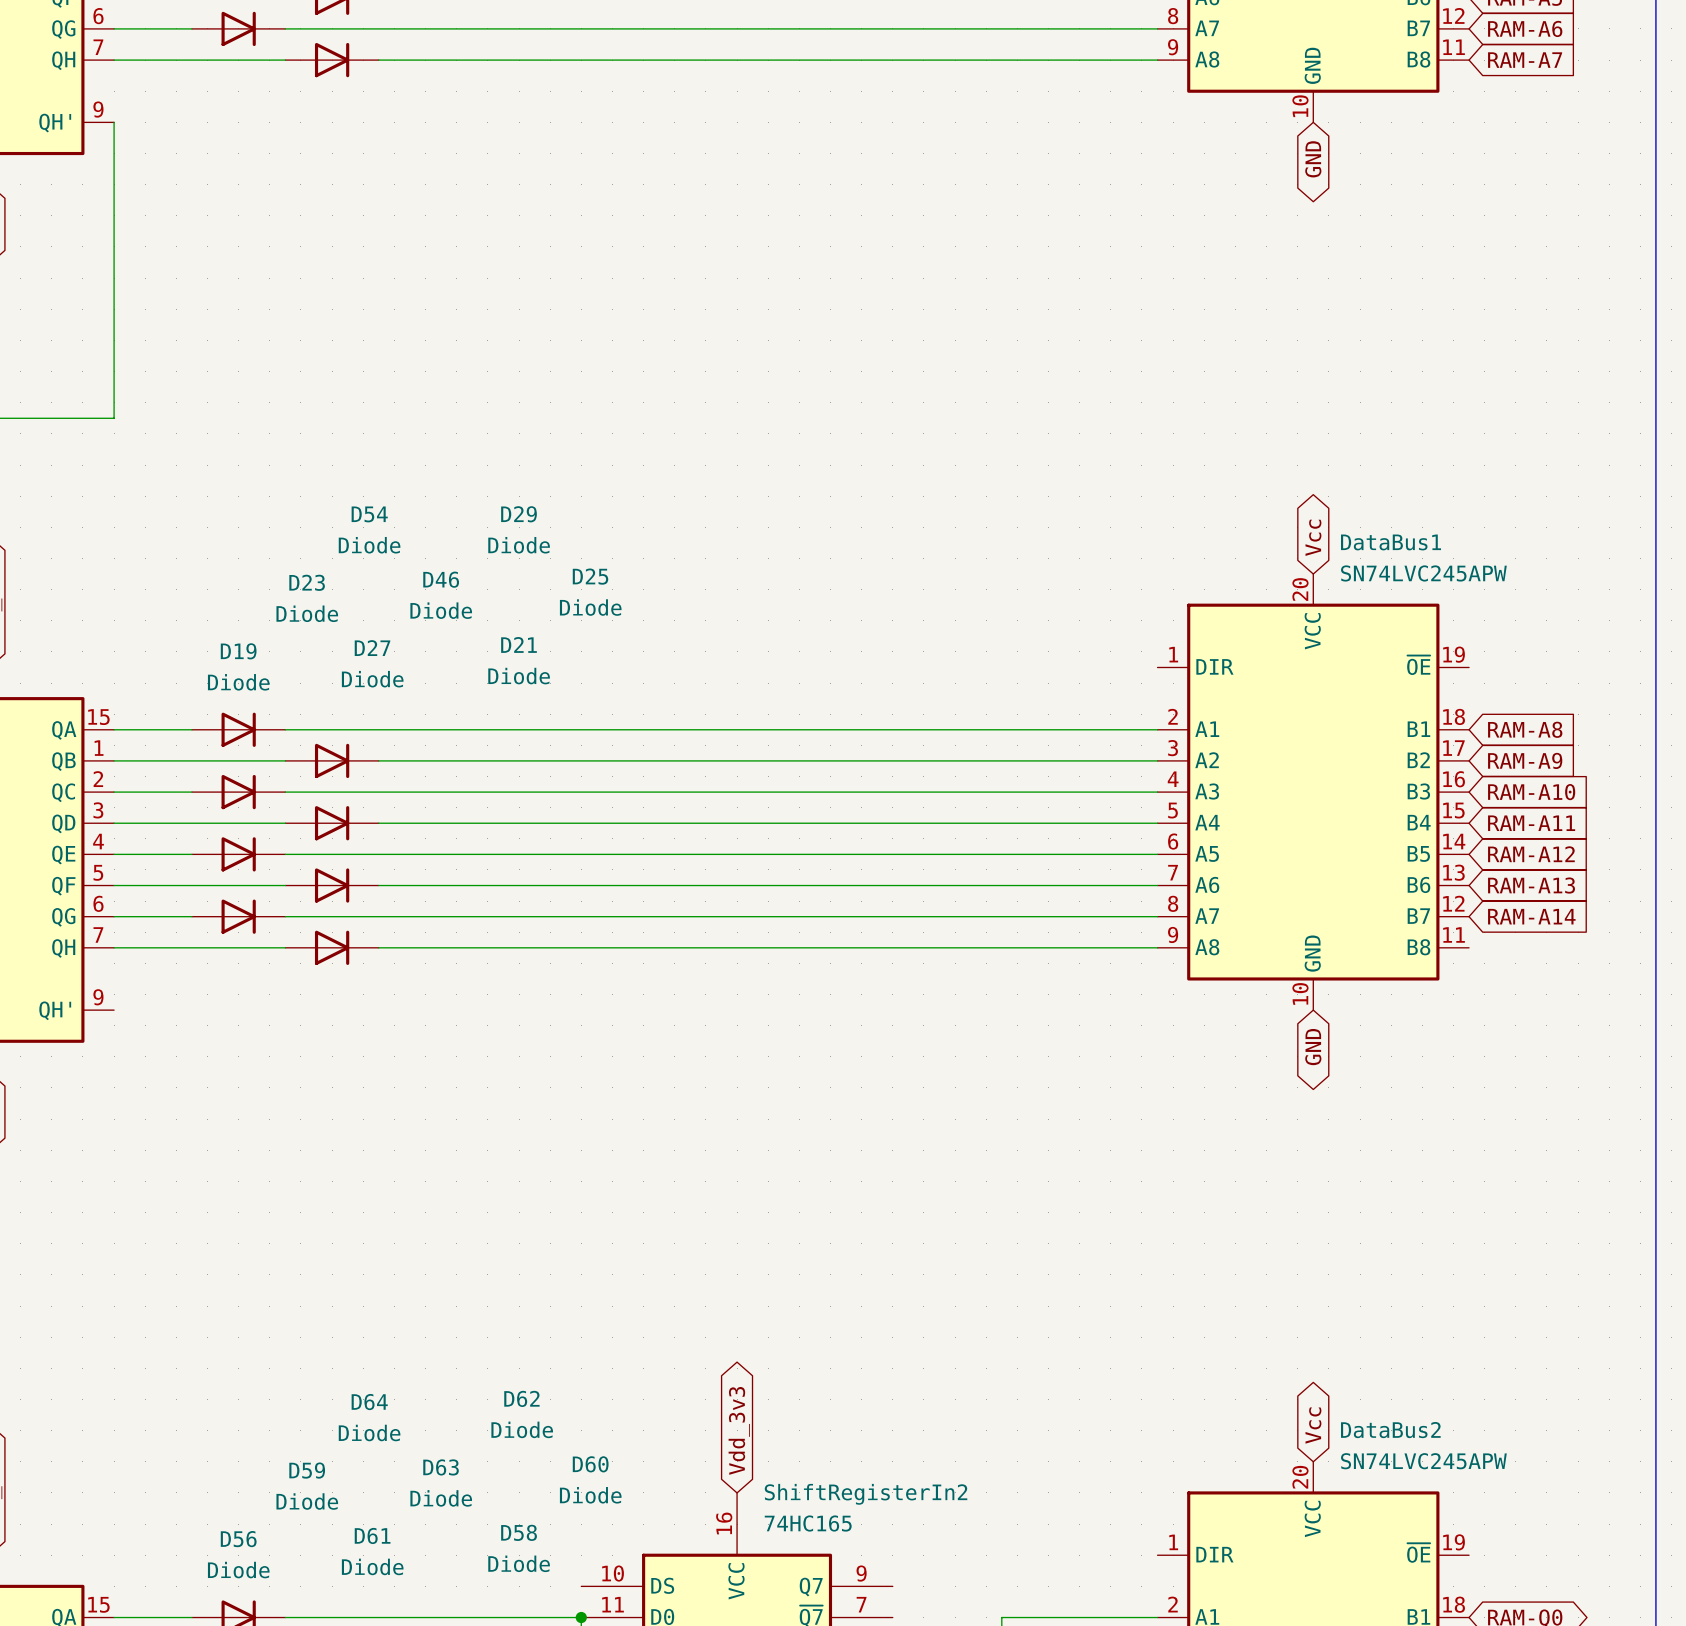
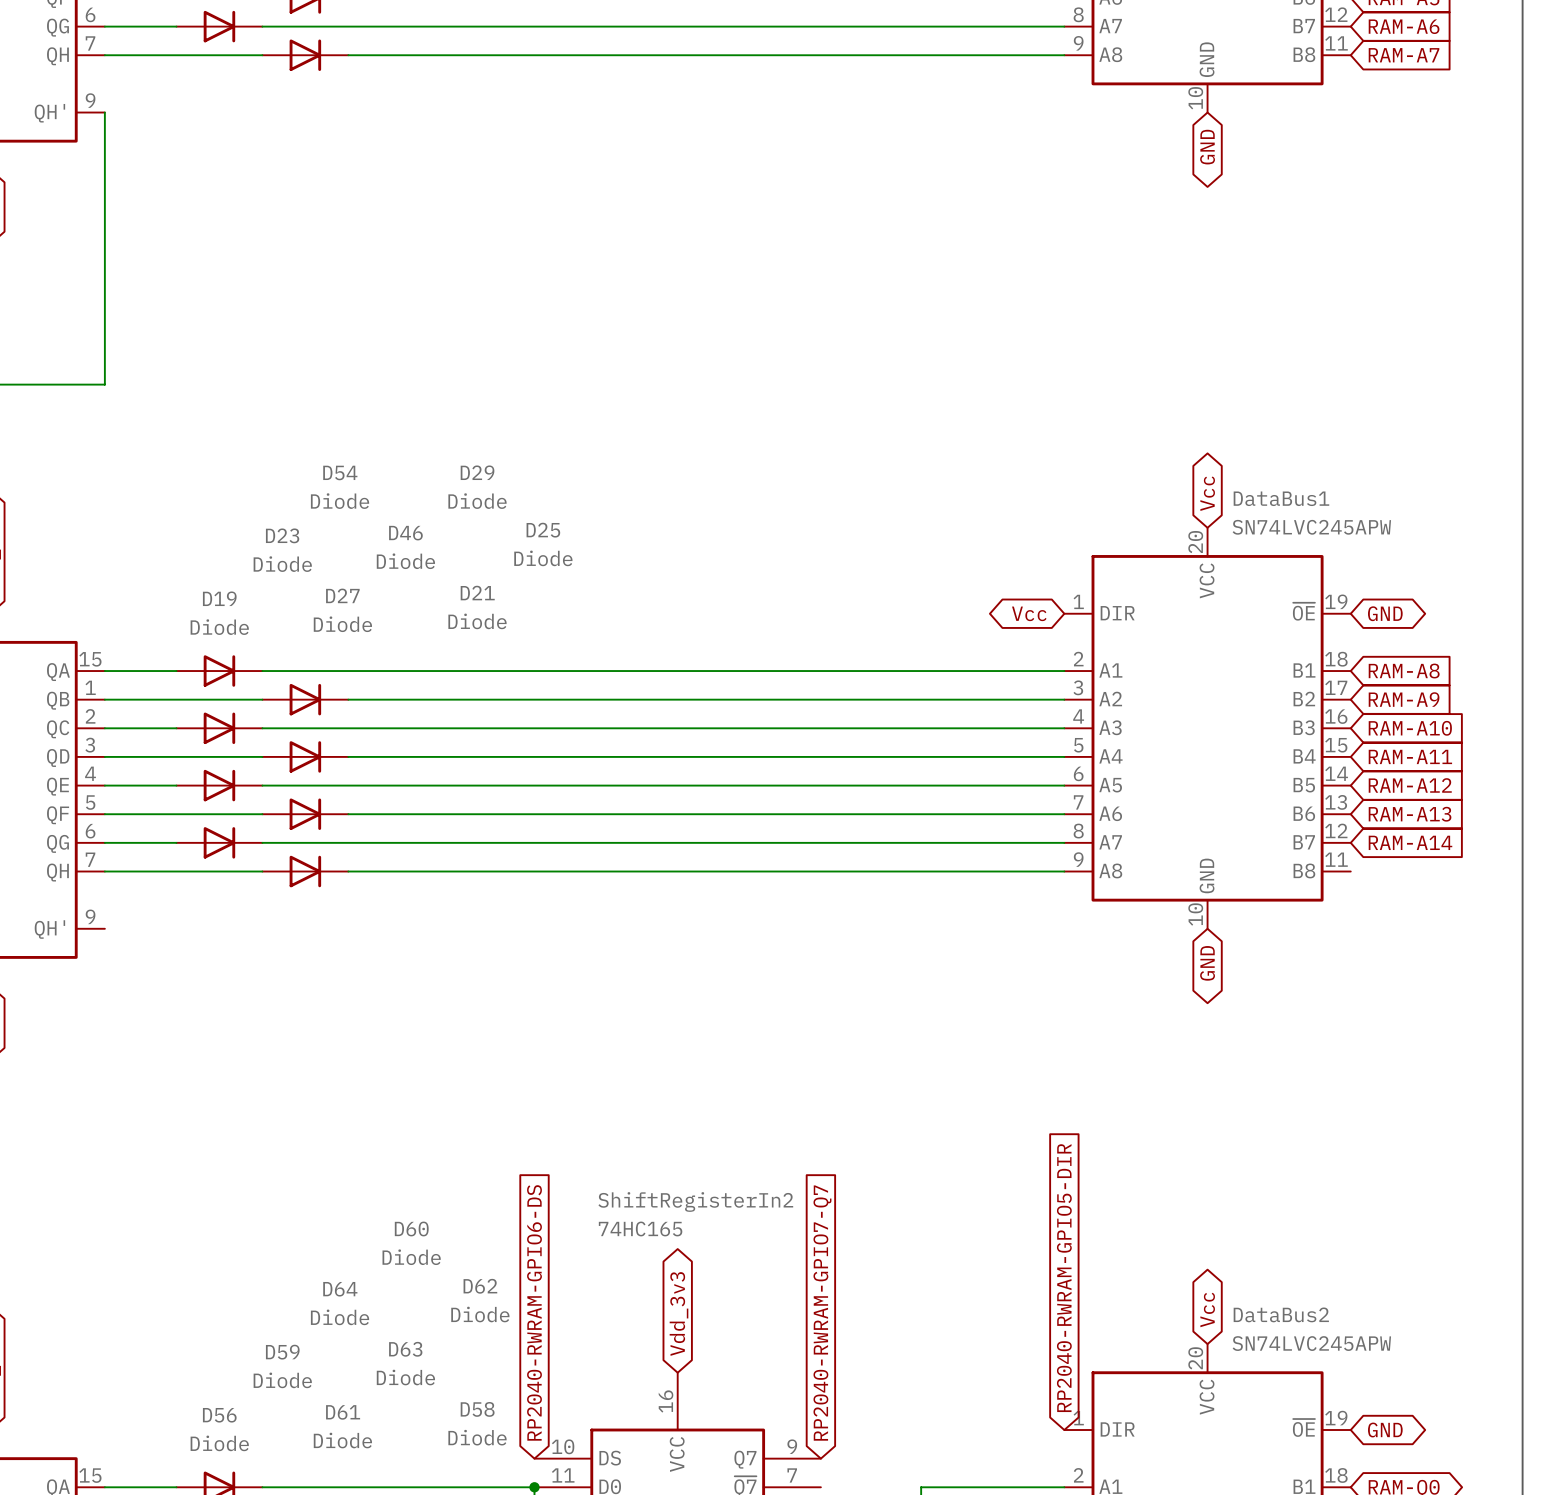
global label: none -> Vcc (1029, 613)
global label: none -> GND (1385, 613)
global label: none -> RP2040-RWRAM-GPIO5-DIR (1064, 1278)
global label: none -> RP2040-RWRAM-GPIO6-DS (534, 1312)
global label: none -> RP2040-RWRAM-GPIO7-Q7 (822, 1313)
D60 name position: D60 (590, 1464) -> D60 (411, 1228)
ShiftRegisterIn2 name position: ShiftRegisterIn2 (866, 1494) -> ShiftRegisterIn2 (695, 1202)
D60 value position: Diode (590, 1495) -> Diode (411, 1257)
ShiftRegisterIn2 value position: 74HC165 (808, 1523) -> 74HC165 (640, 1228)
global label: none -> GND (1385, 1430)

